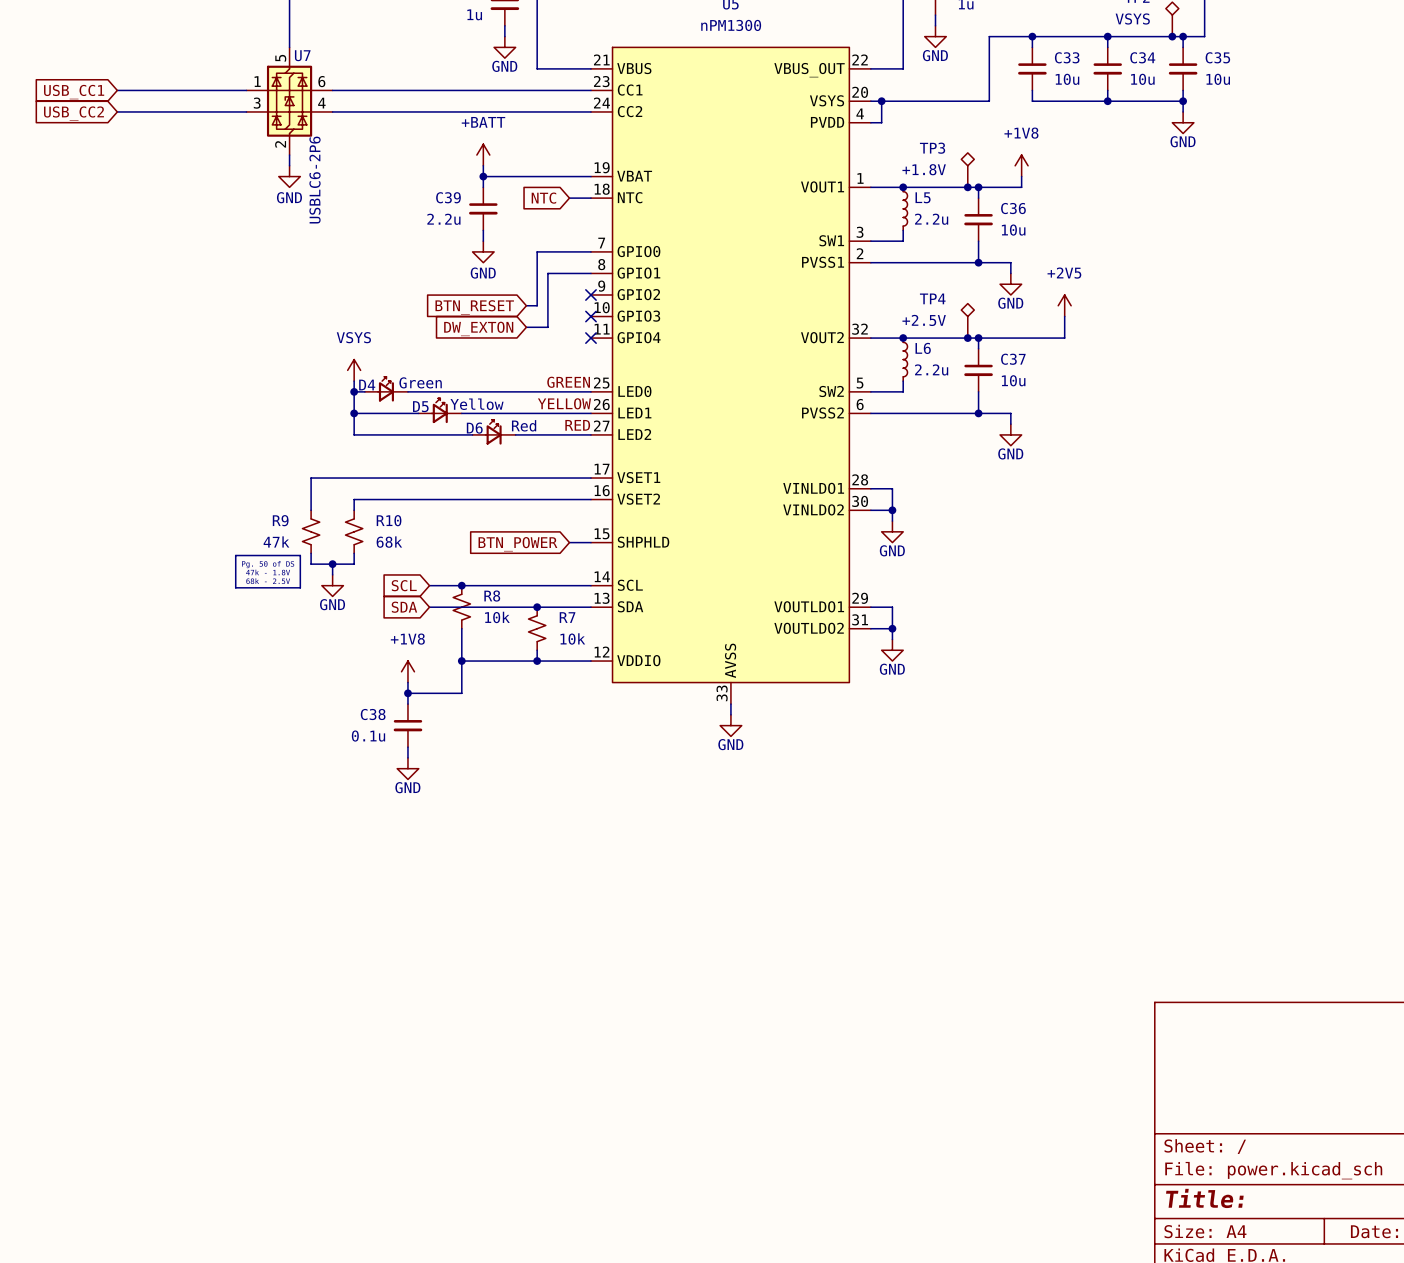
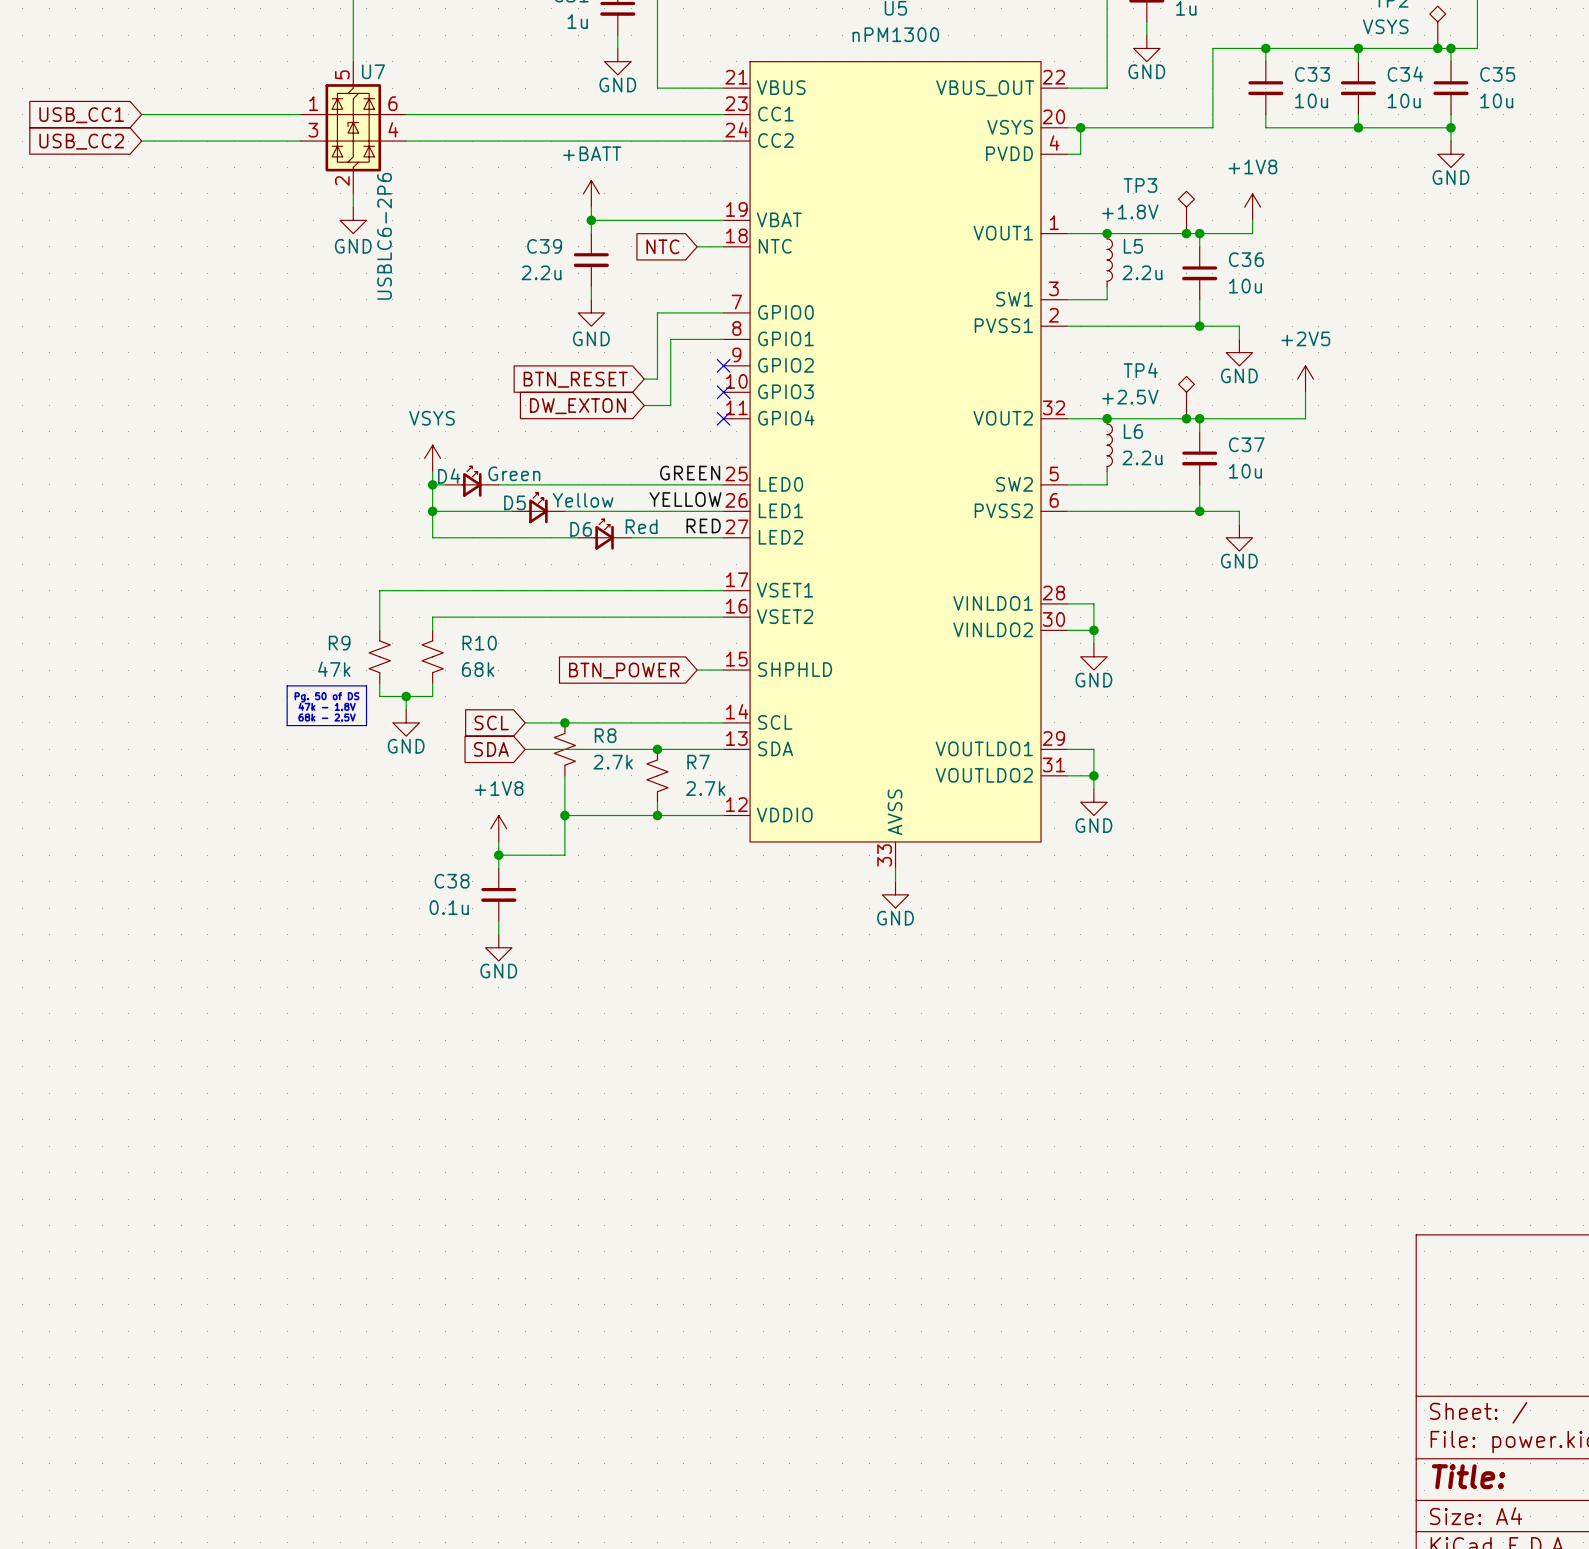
R8 value: 10k (497, 617) -> 2.7k (613, 762)
R7 value: 10k (572, 638) -> 2.7k (705, 788)

